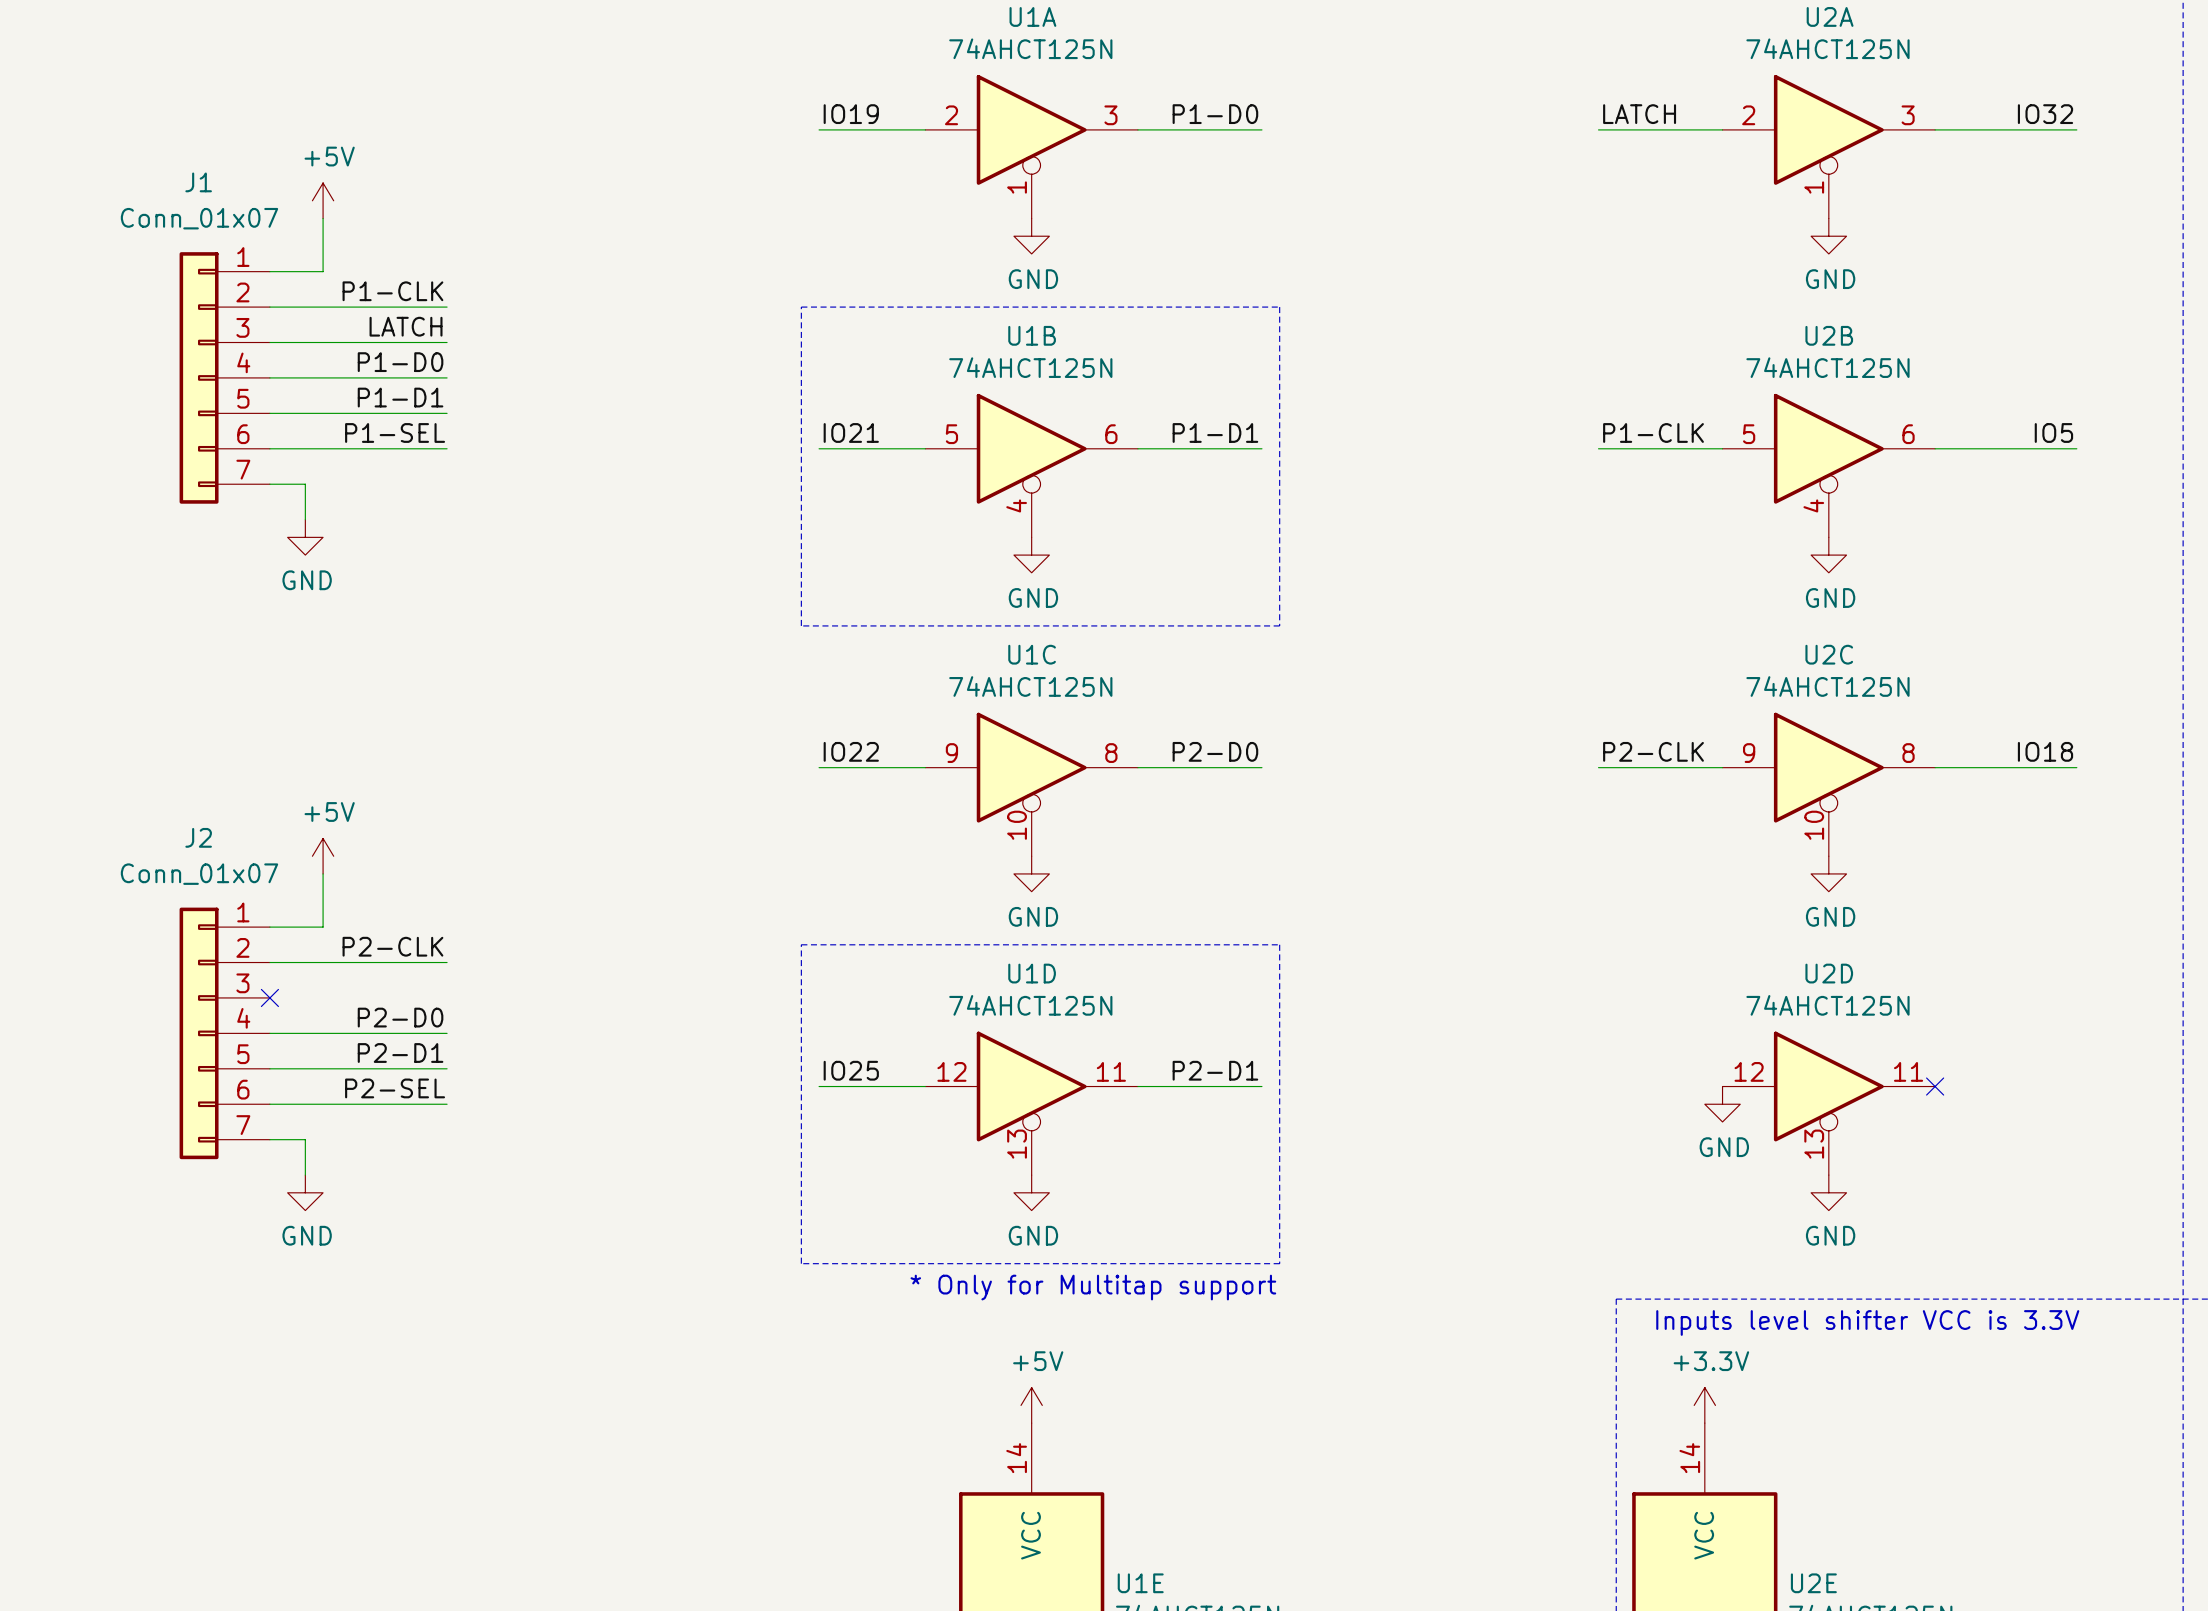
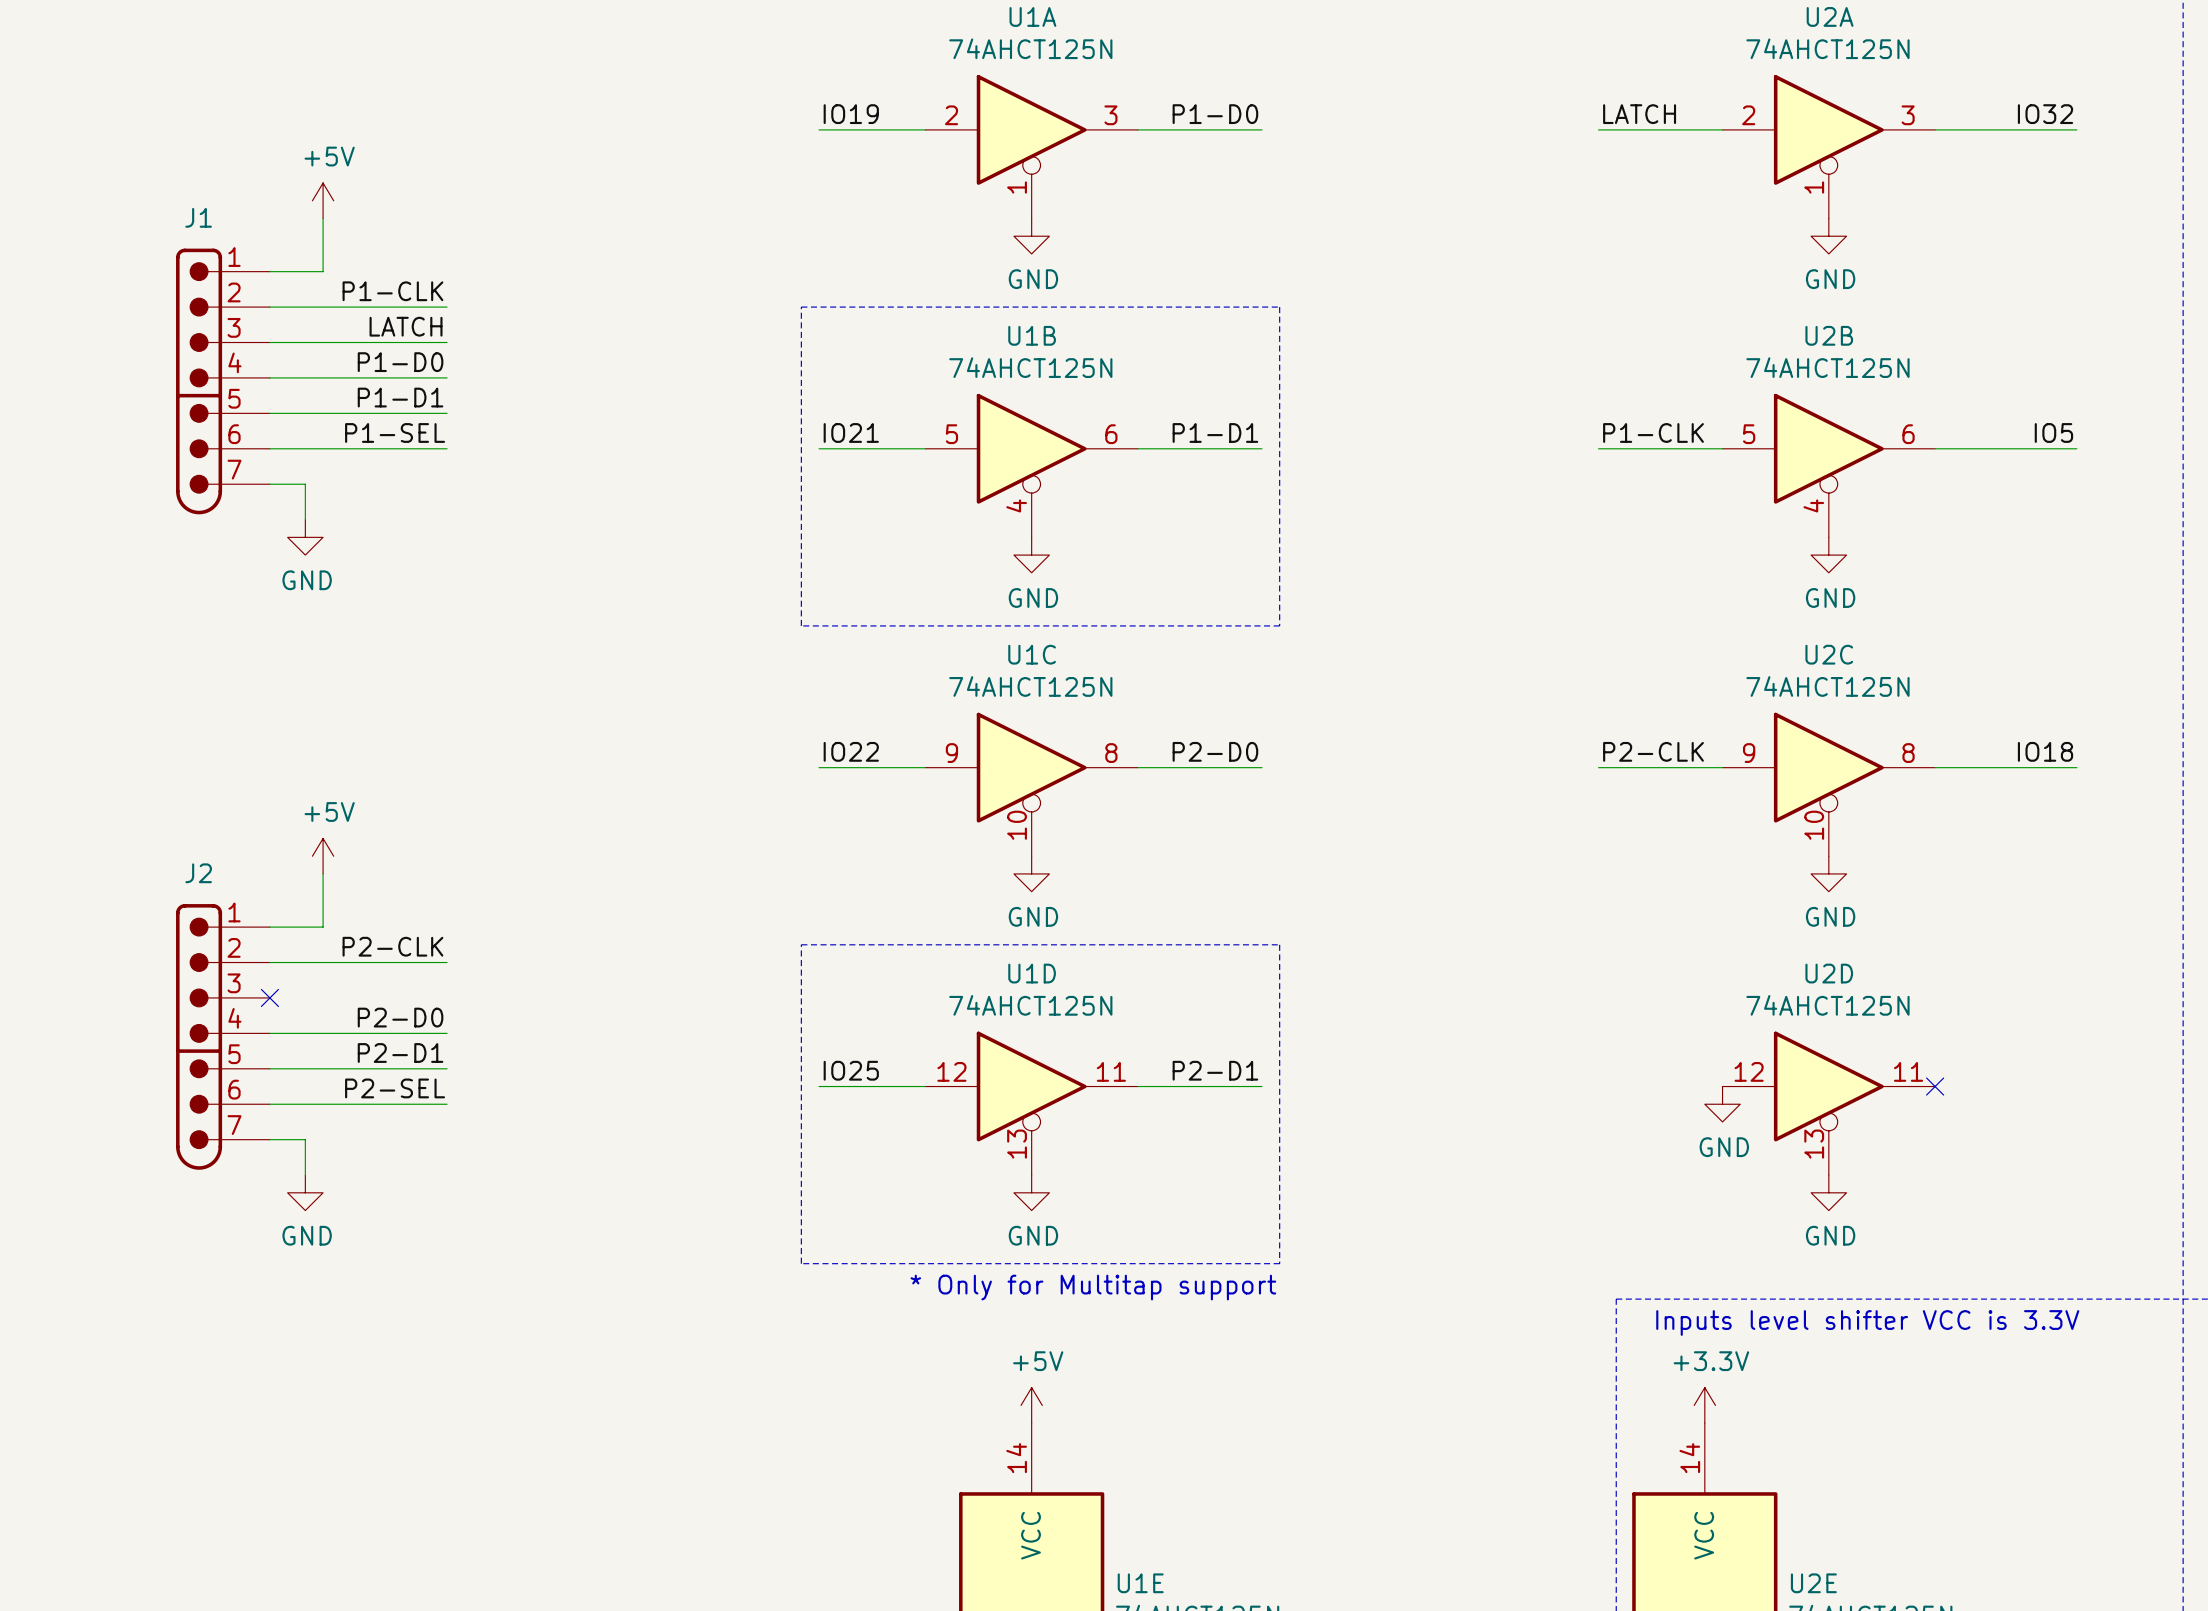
J1 name position: J1 (198, 182) -> J1 (198, 217)
J1 value: Conn_01x07 (199, 218) -> none
J1 symbol: [179, 252, 270, 504] -> [176, 248, 270, 515]
J2 name position: J2 (198, 837) -> J2 (198, 873)
J2 value: Conn_01x07 (199, 874) -> none
J2 symbol: [179, 907, 270, 1160] -> [176, 904, 270, 1170]

